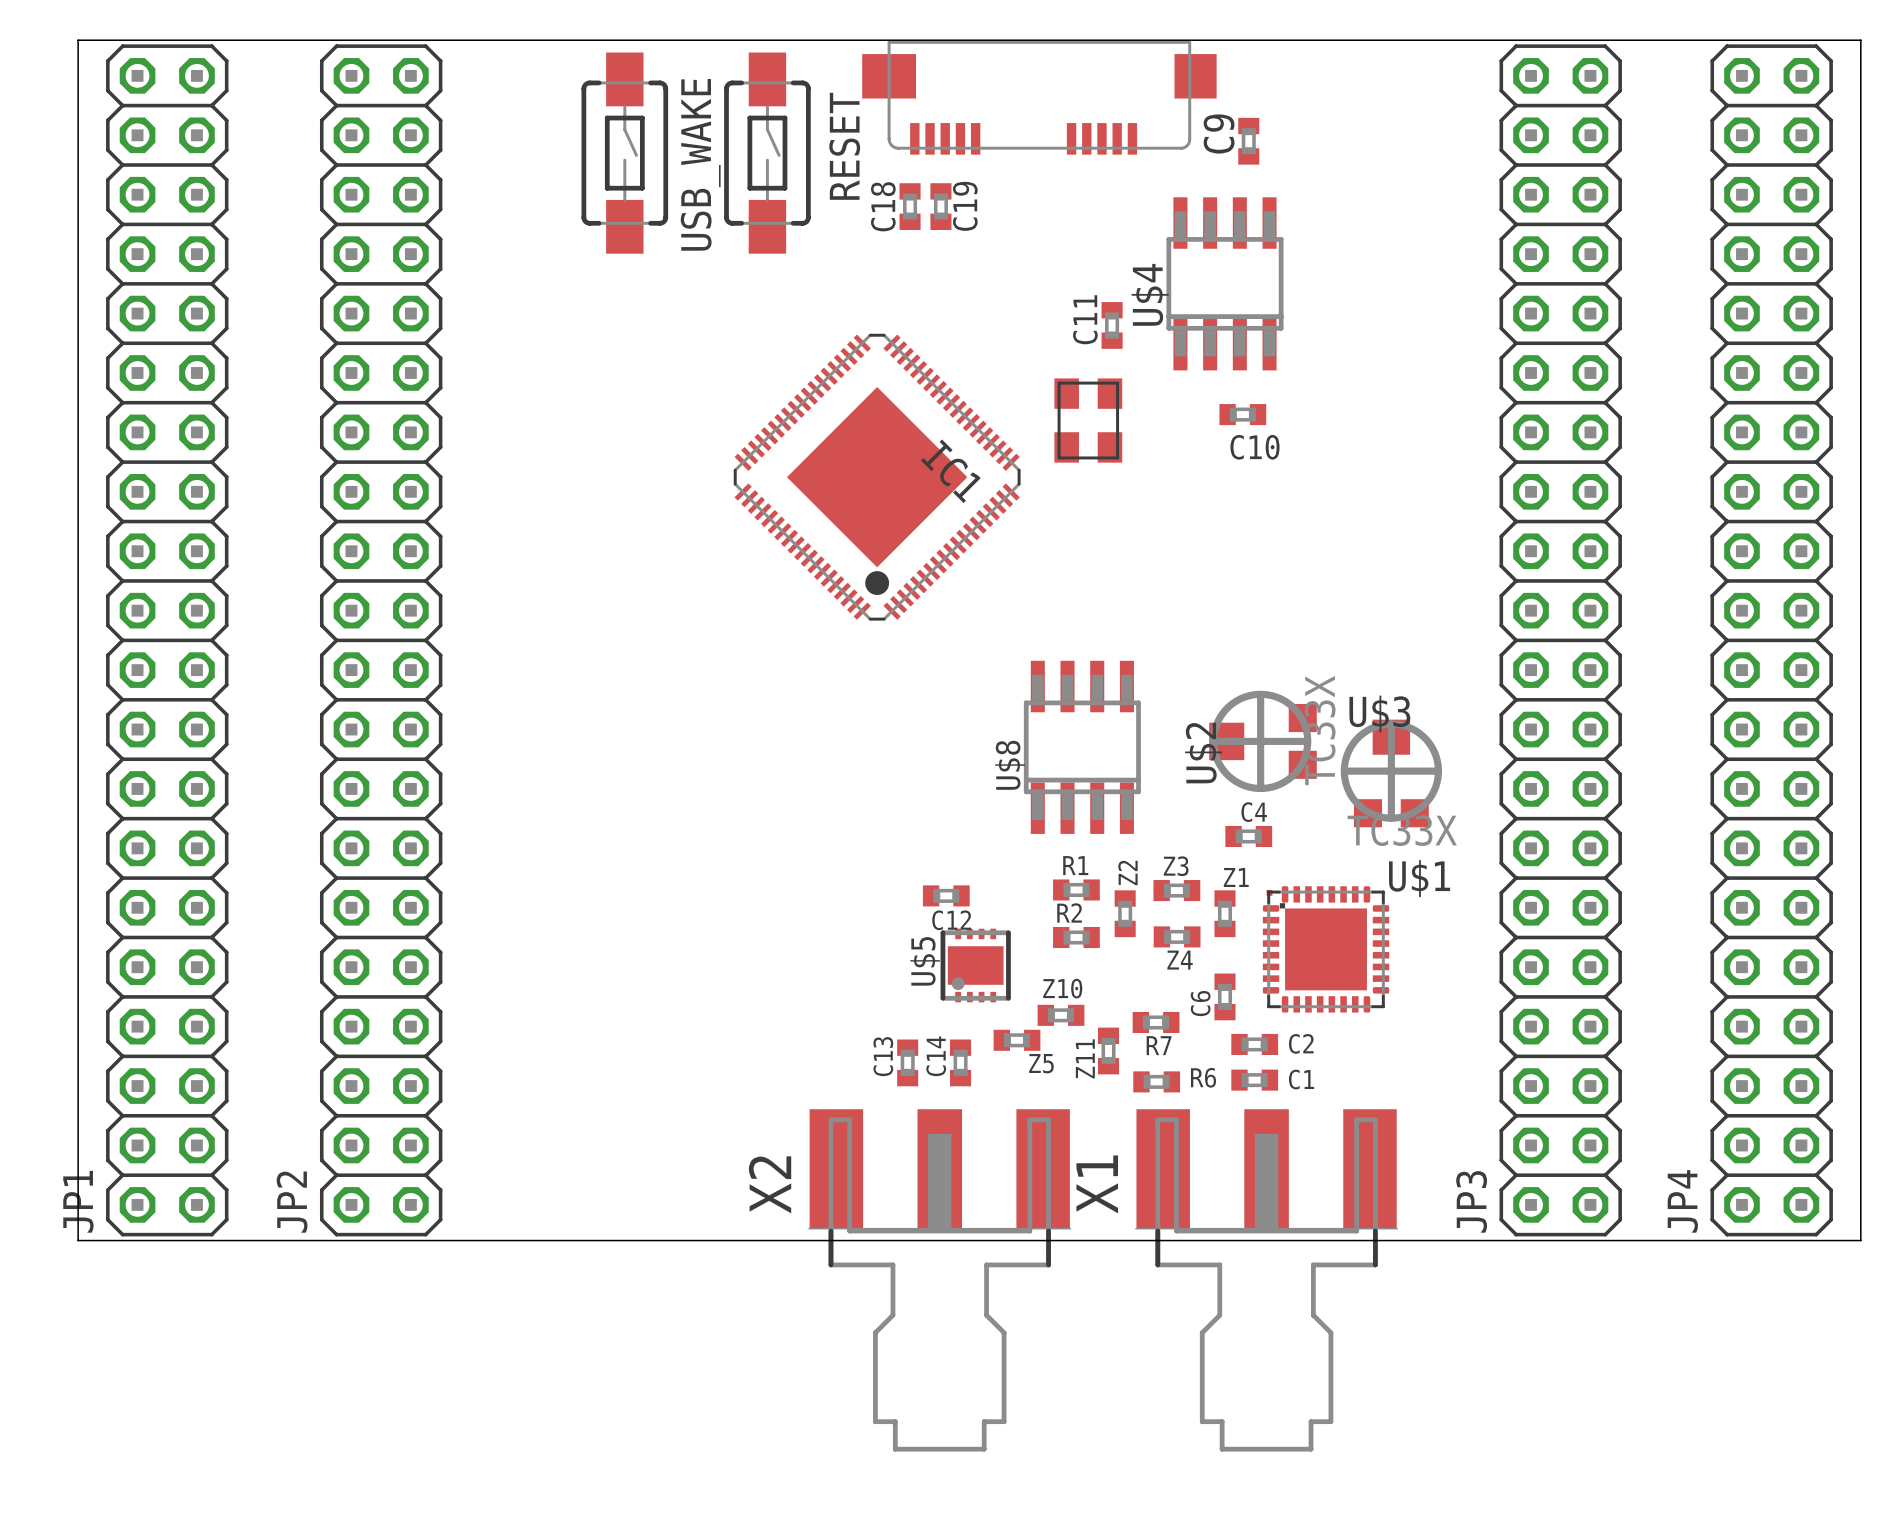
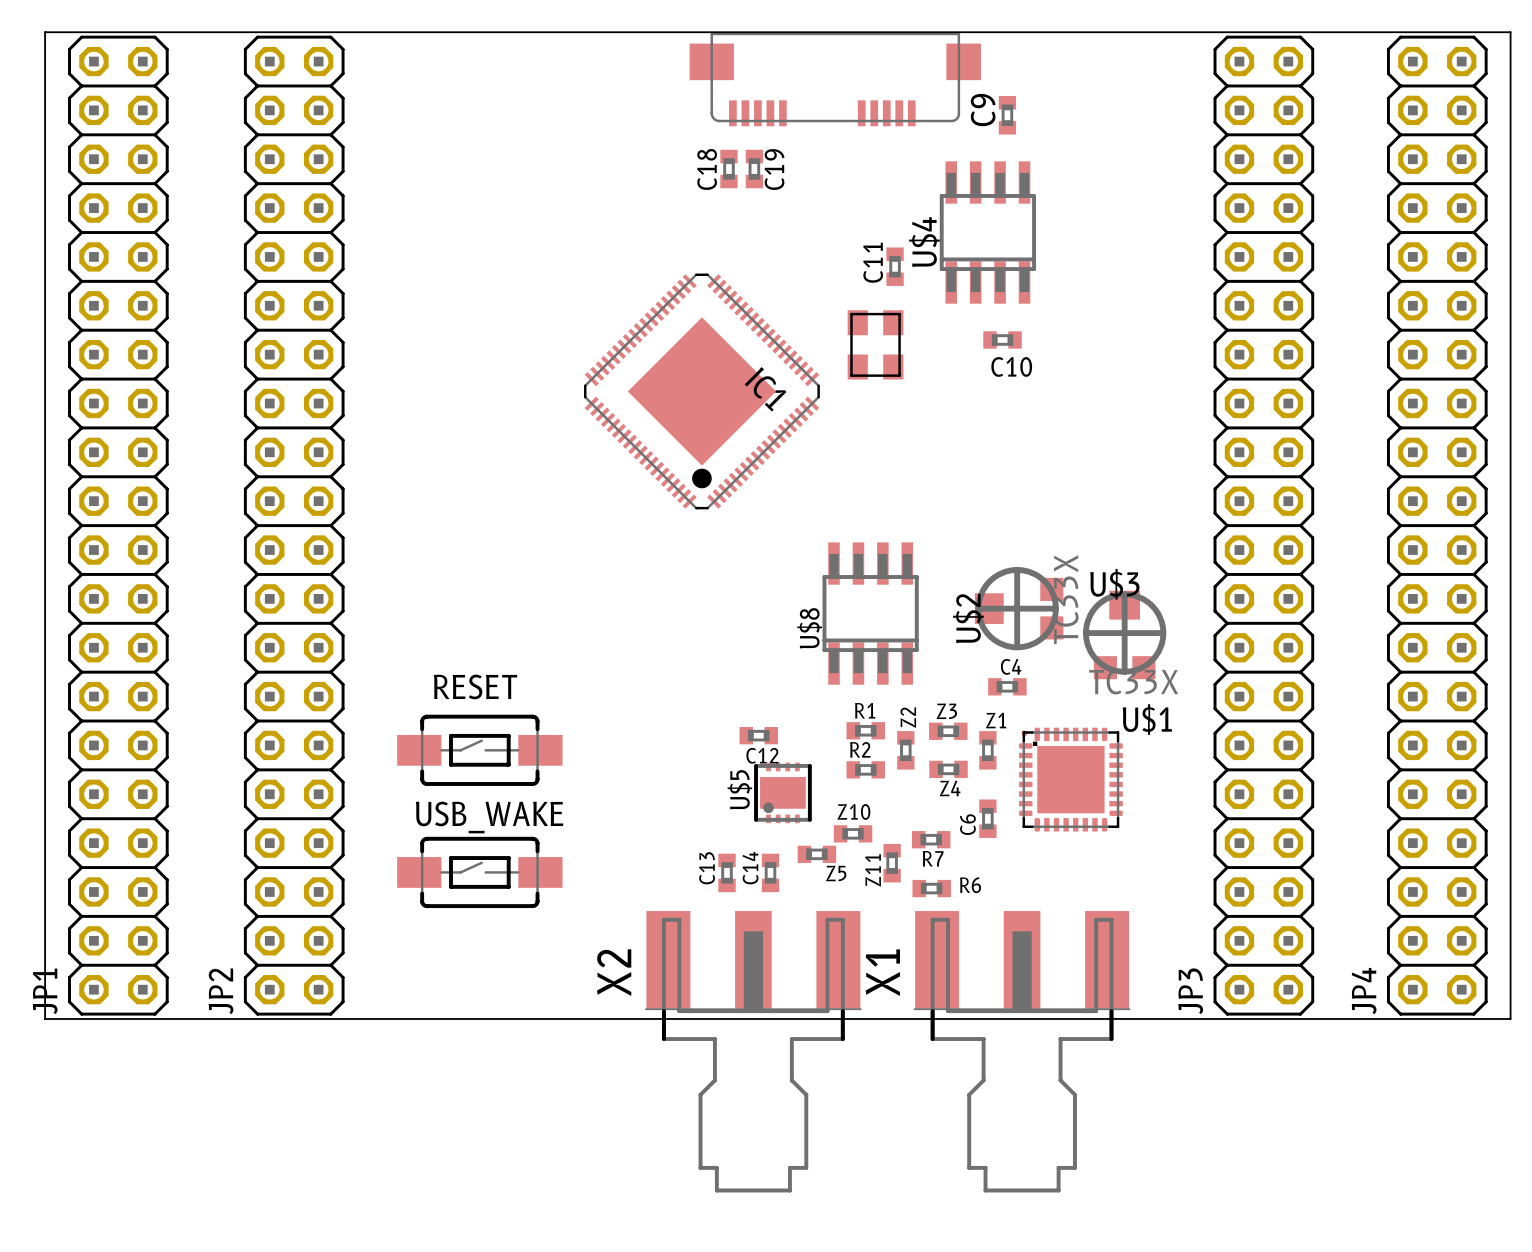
USB_WAKE: (624, 153) -> none
RESET: (767, 153) -> none
RESET: none -> (479, 750)
C2: (1254, 1044) -> none
USB_WAKE: none -> (479, 872)
C1: (1254, 1080) -> none

